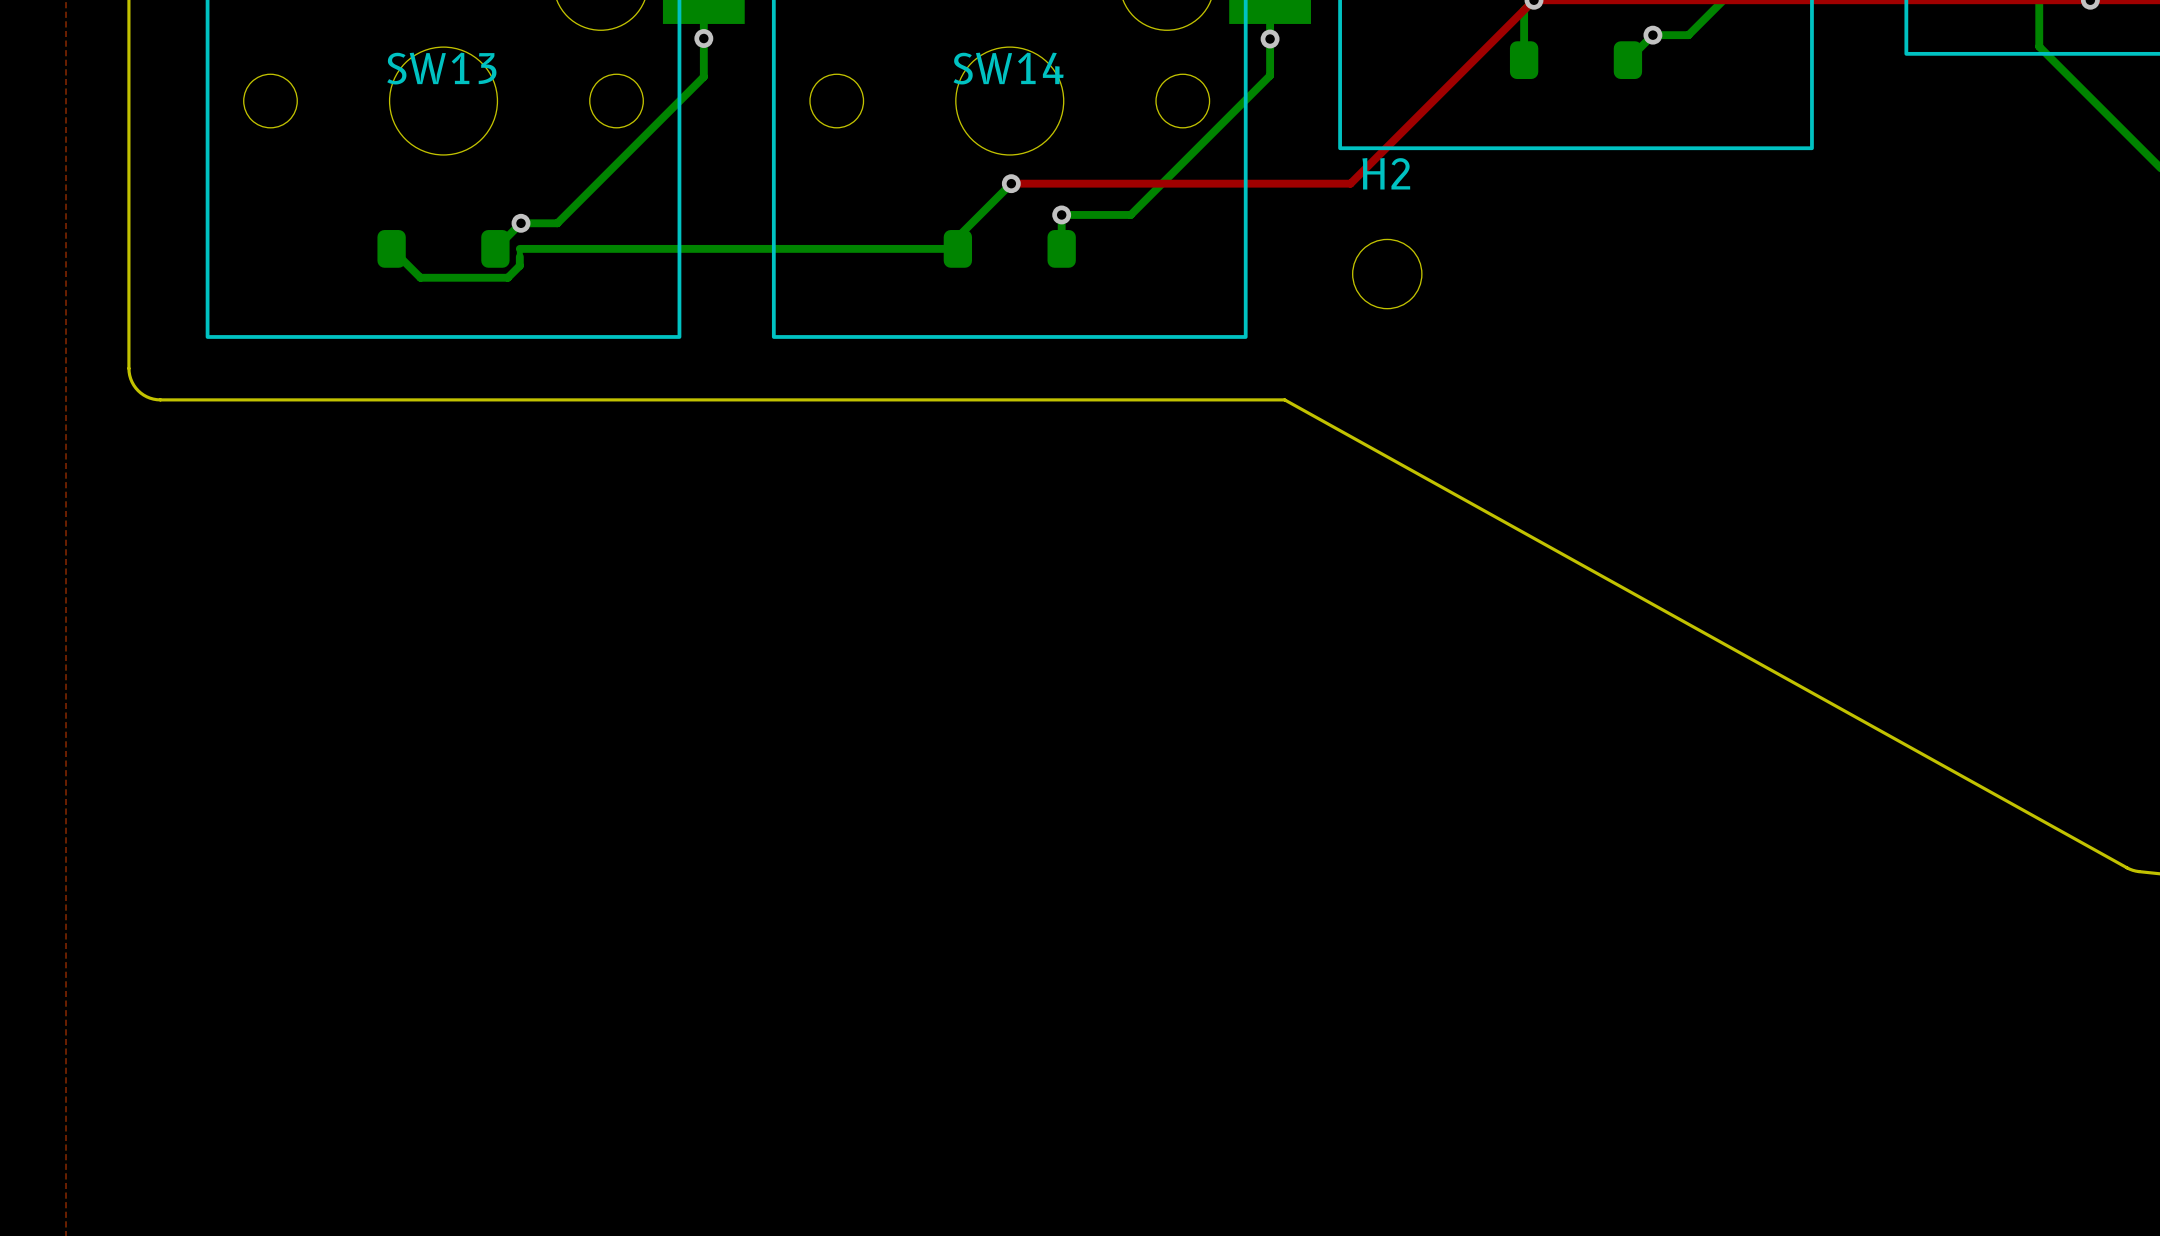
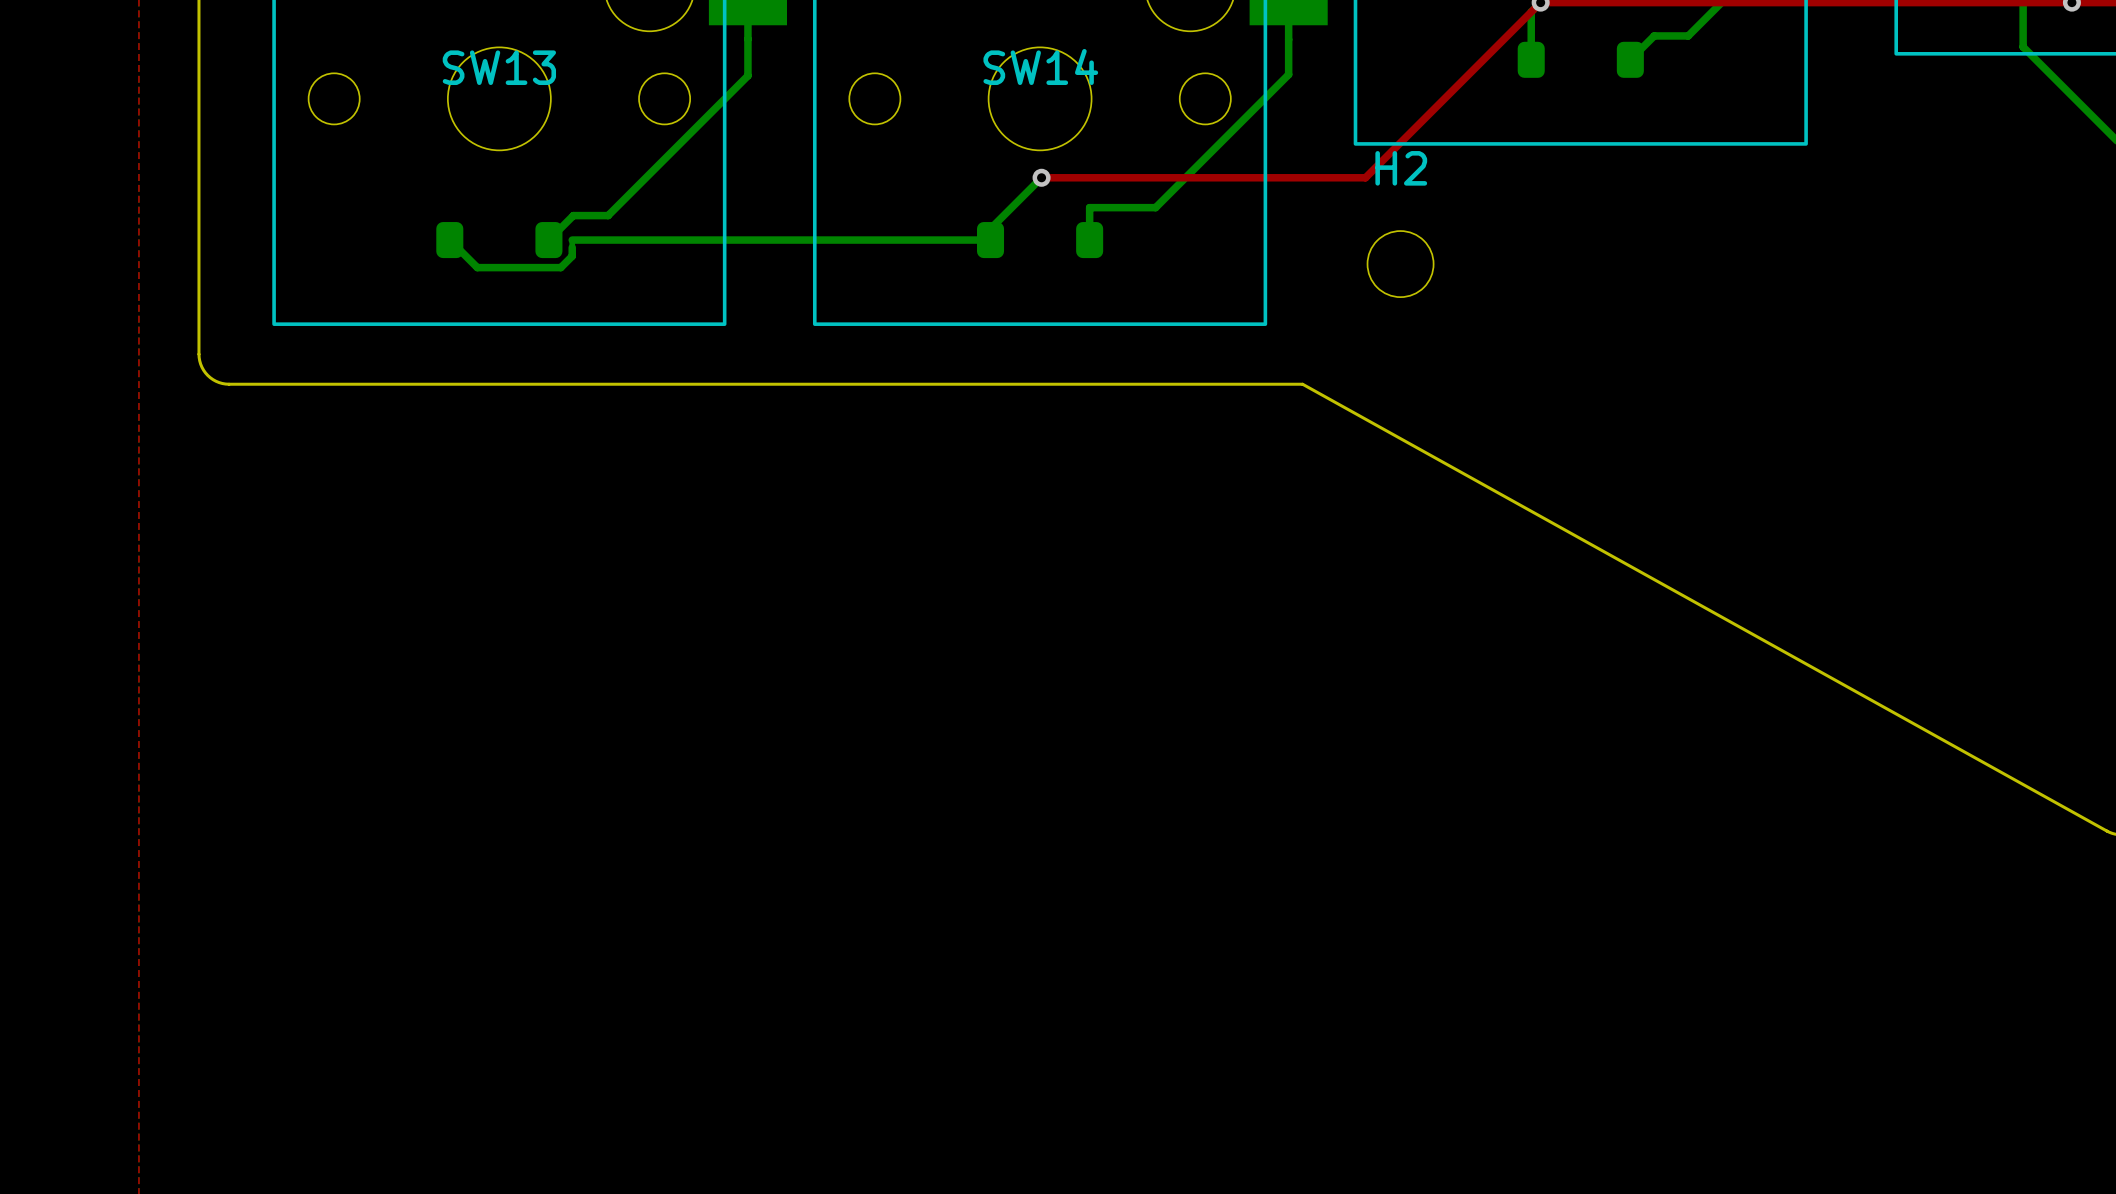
via: (1652, 35) -> none
via: (703, 38) -> none
via: (1270, 39) -> none
via: (1061, 214) -> none
via: (521, 223) -> none

